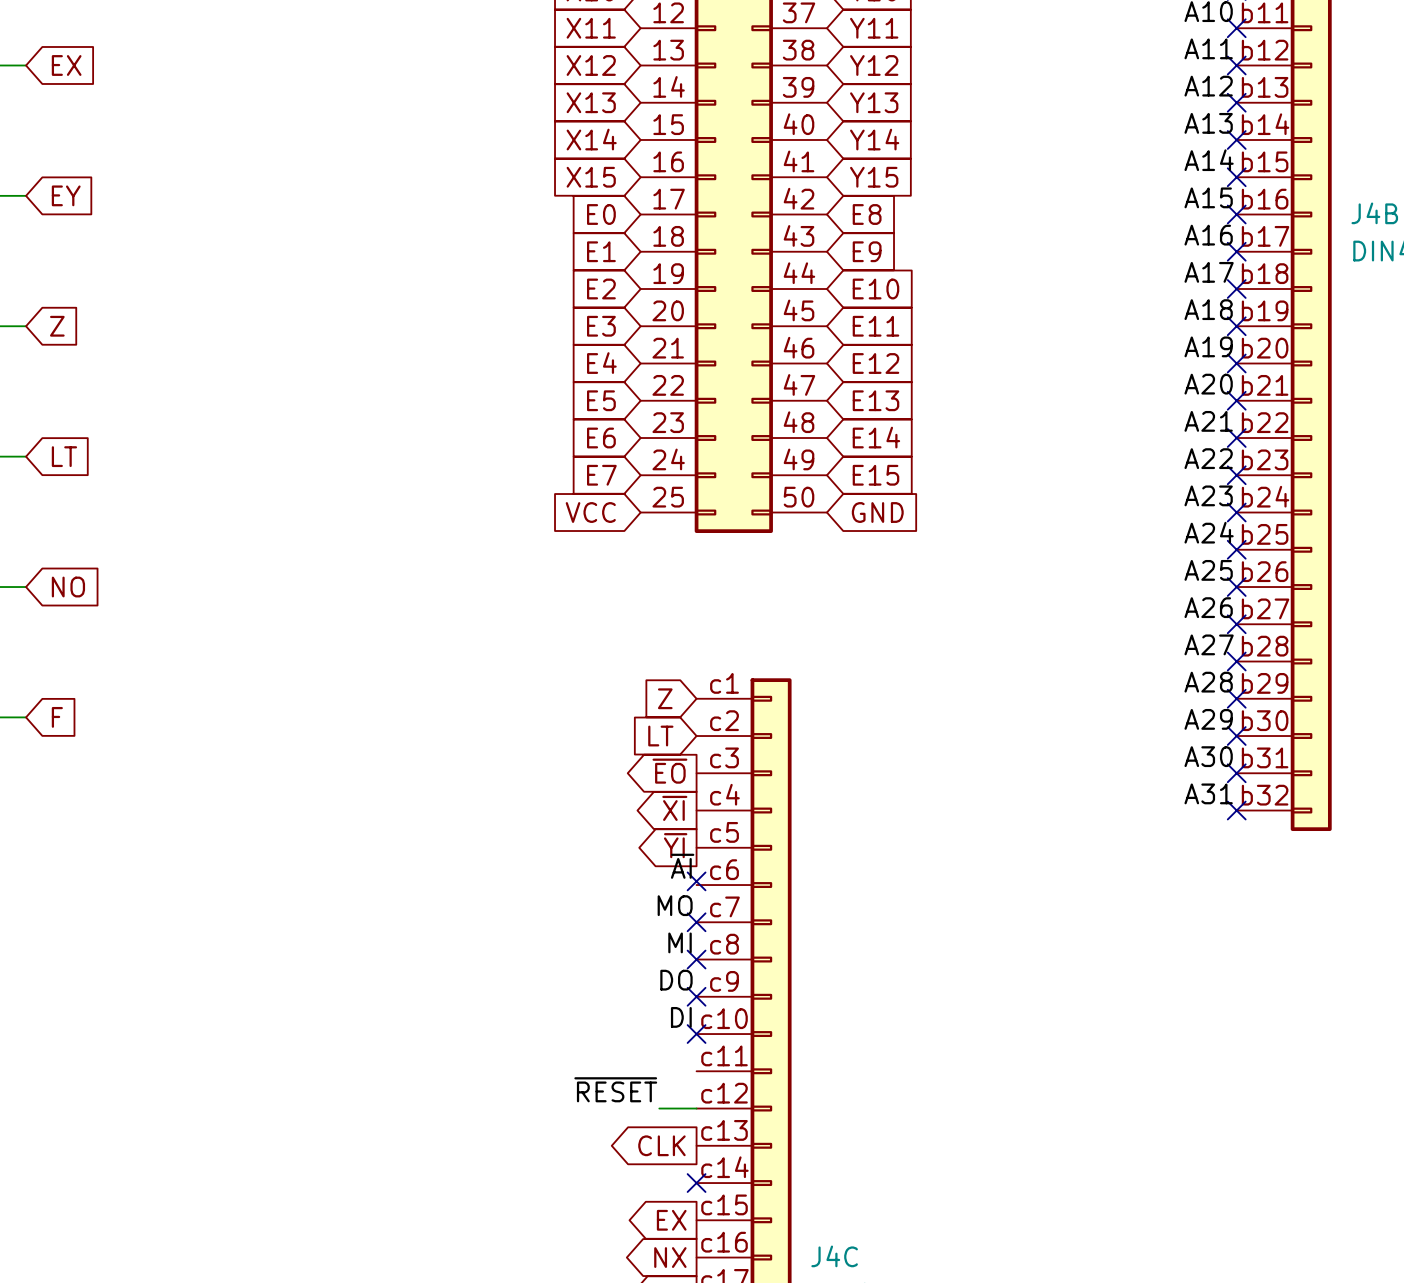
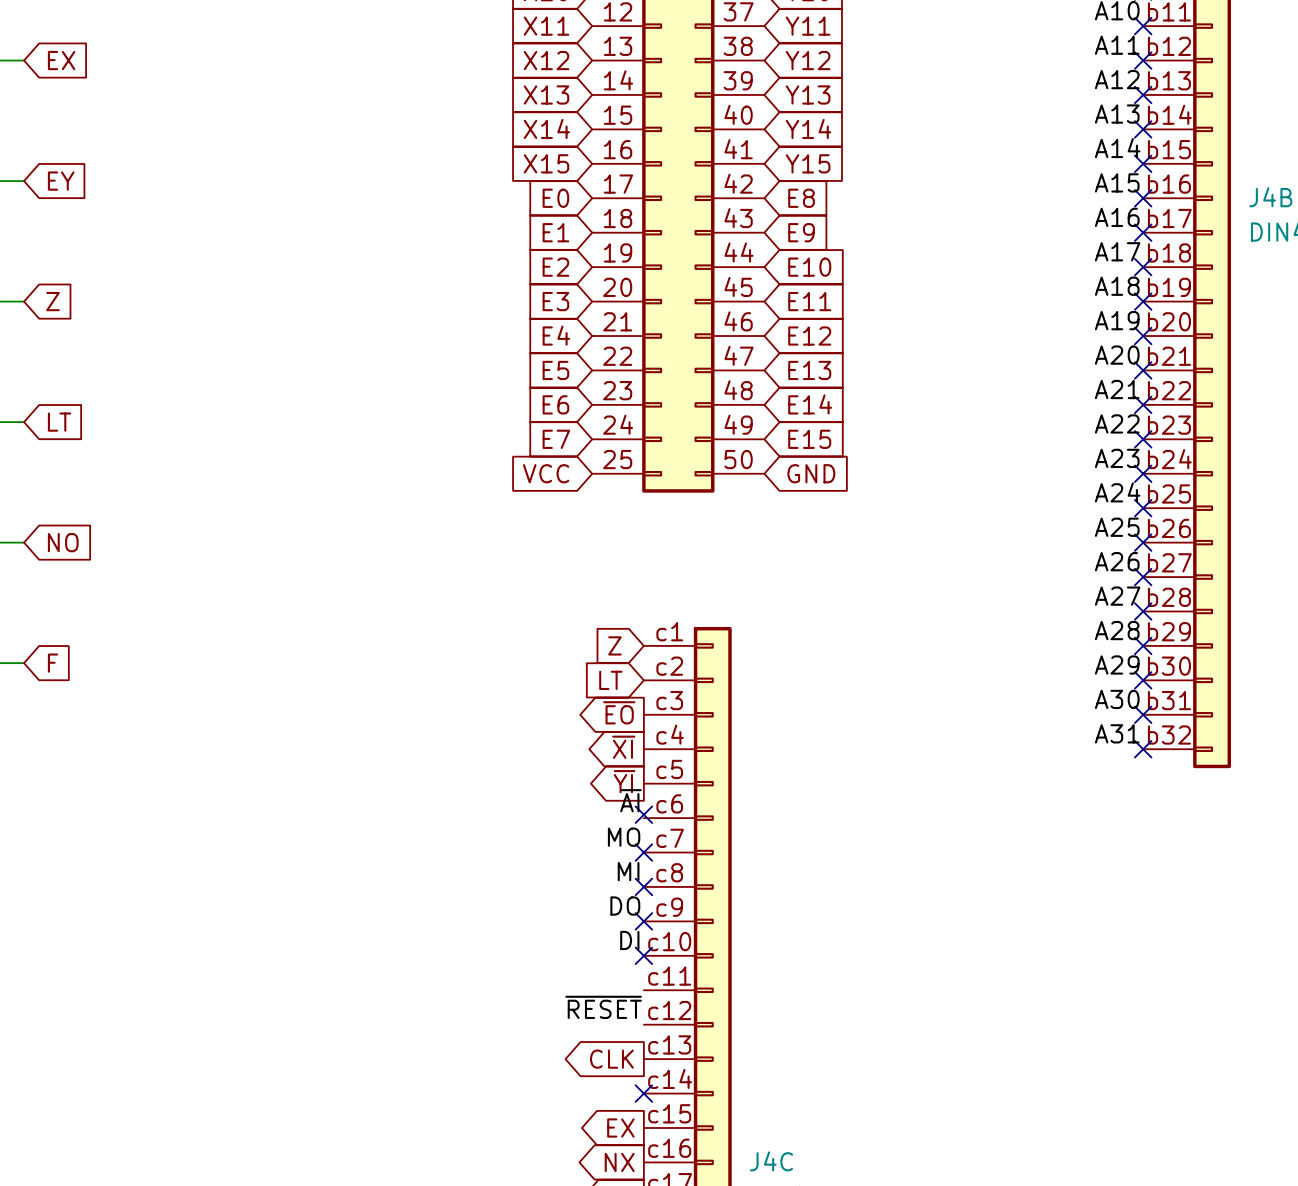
label position: ~{RESET} (615, 1089) -> ~{RESET} (603, 1007)
wire: (659, 1108) (696, 1108) -> none

